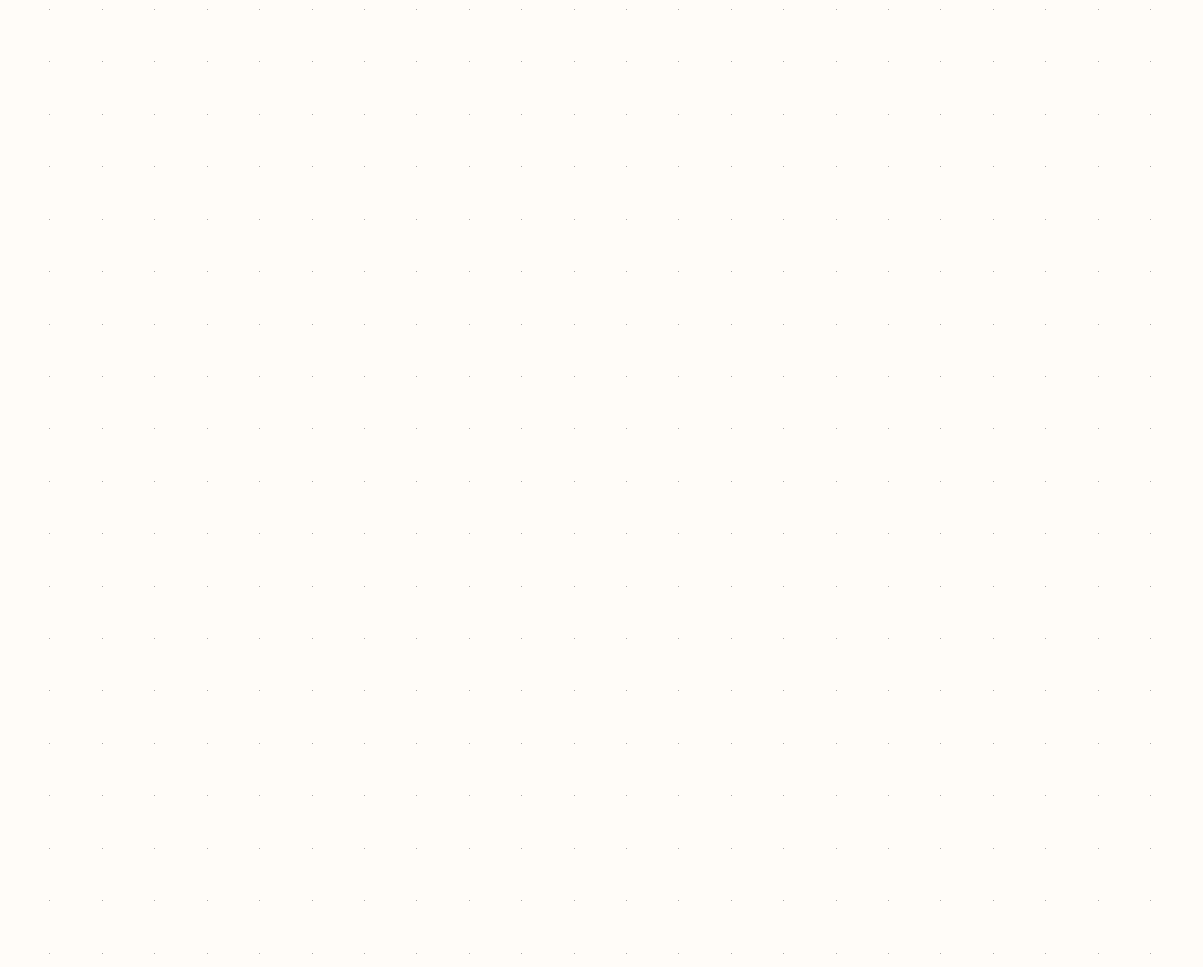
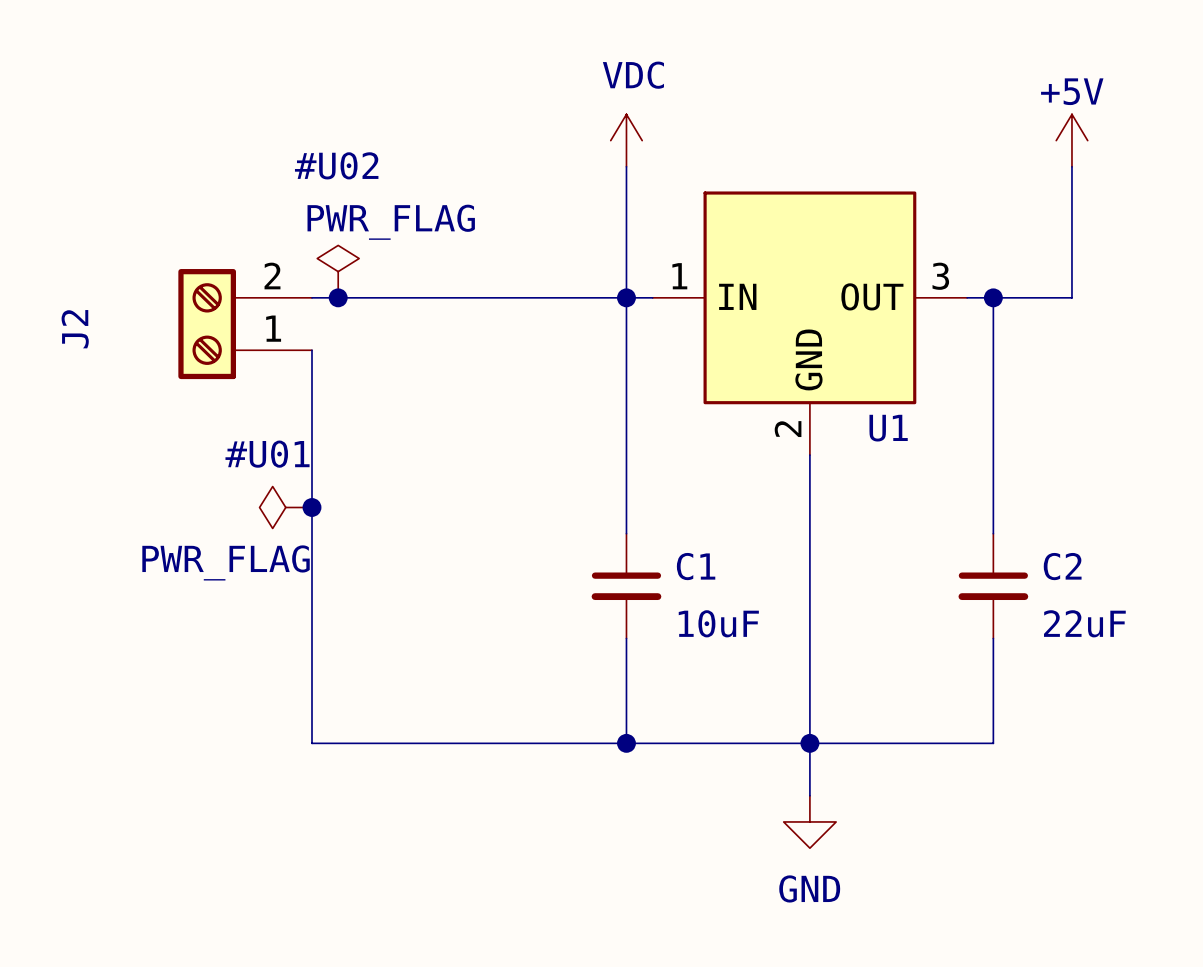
power symbol: none -> VDC (626, 140)
power symbol: none -> +5V (1071, 140)
wire: none -> (626, 166) (626, 533)
wire: none -> (1071, 166) (1071, 297) (967, 297)
#U02: none -> PWR_FLAG (338, 271)
wire: none -> (312, 297) (652, 297)
junction: none -> (338, 297)
junction: none -> (626, 297)
wire: none -> (993, 297) (993, 533)
junction: none -> (993, 297)
U1: none -> (809, 323)
J2: none -> (245, 324)
wire: none -> (312, 350) (312, 743) (993, 743) (993, 638)
wire: none -> (809, 455) (809, 795)
#U01: none -> PWR_FLAG (285, 507)
junction: none -> (312, 507)
C1: none -> 10uF (626, 586)
C2: none -> 22uF (993, 586)
wire: none -> (626, 638) (626, 743)
junction: none -> (626, 743)
junction: none -> (809, 743)
power symbol: none -> GND (809, 821)

